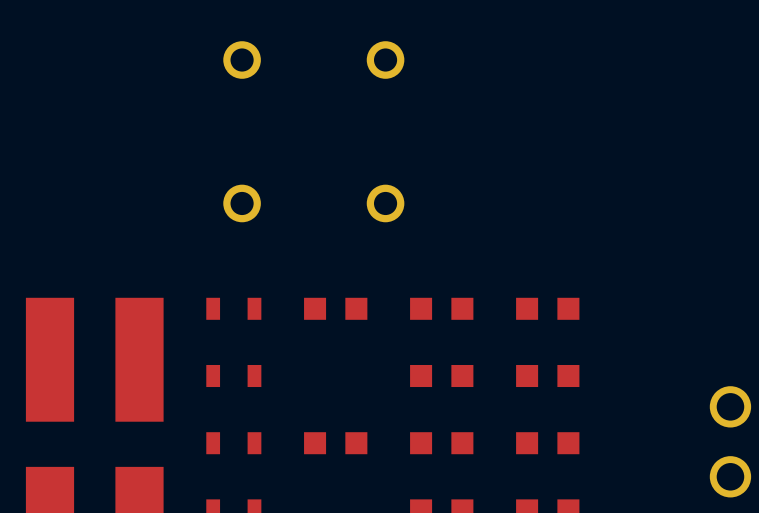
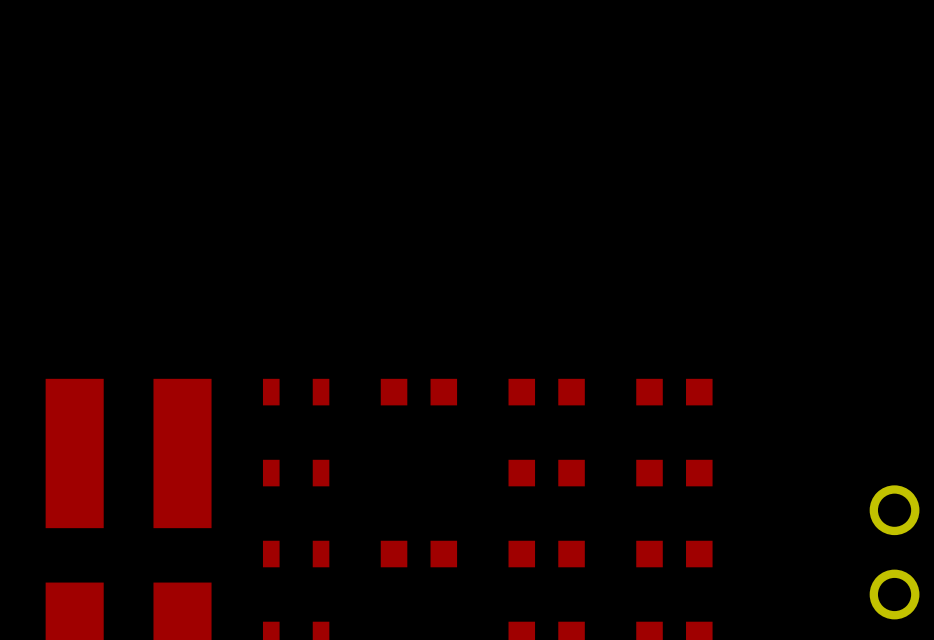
part: (242, 60) -> none
part: (385, 60) -> none
part: (242, 203) -> none
part: (385, 203) -> none

